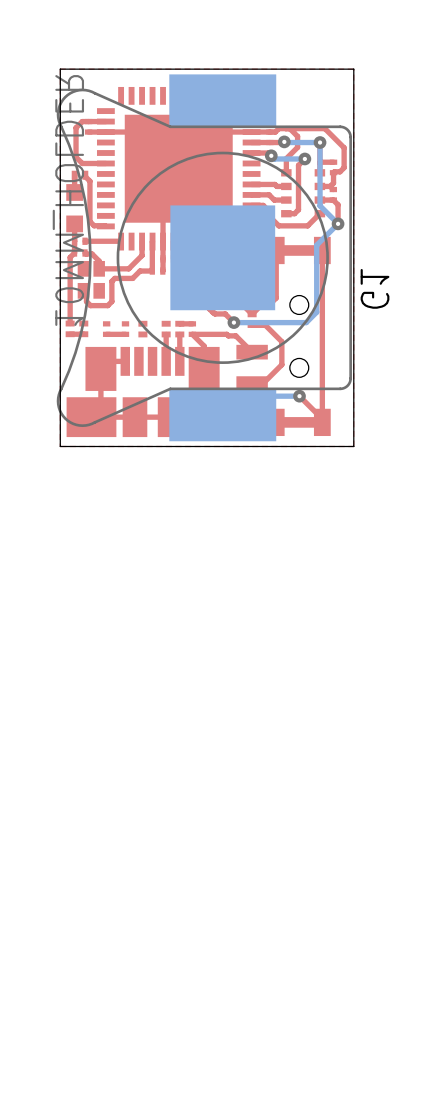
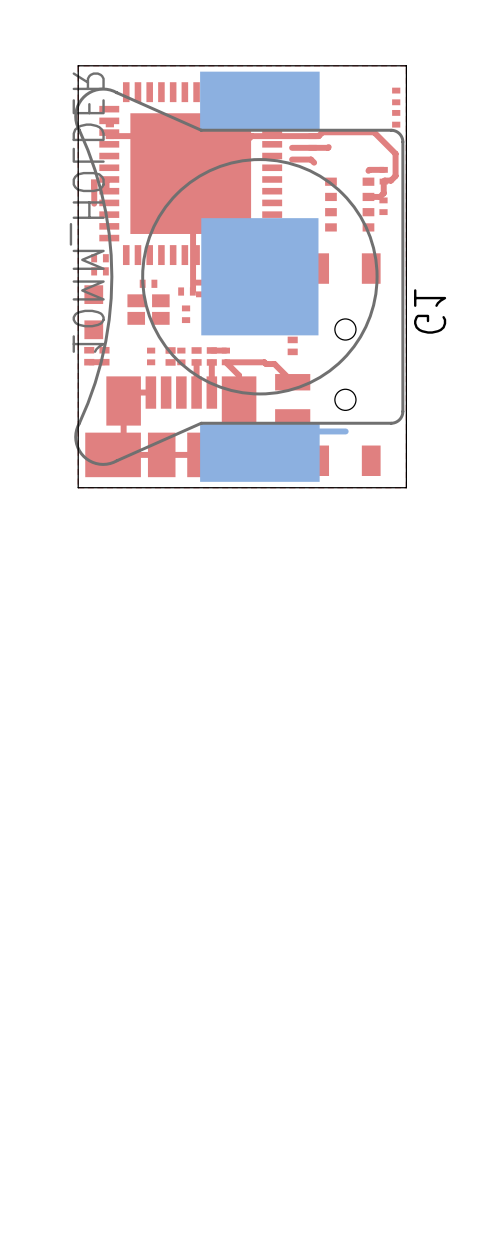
part: none -> (396, 96)
part: none -> (396, 118)
top track: (105, 121) (82, 121) (76, 127) (76, 157) (82, 163) (105, 163) -> none
top track: (289, 128) (297, 136) (297, 147) (286, 158) (286, 172) -> none
bottom track: (284, 141) (320, 142) (320, 205) (338, 223) (316, 245) (316, 312) (306, 322) (233, 322) -> none
via: (284, 141) -> none
via: (320, 142) -> none
bottom track: (271, 155) (274, 158) (304, 158) -> none
via: (271, 155) -> none
top track: (304, 158) (298, 165) (298, 209) (294, 213) (286, 213) -> none
via: (304, 158) -> none
part position: (178, 168) -> (190, 173)
top track: (85, 175) (89, 181) (89, 221) (94, 225) (105, 226) -> none
top track: (251, 184) (286, 186) -> none
top track: (251, 194) (269, 194) (274, 200) (286, 200) -> none
top track: (319, 200) (333, 200) (338, 204) (338, 223) -> none
top track: (251, 205) (263, 205) (267, 209) (267, 214) (278, 225) (307, 225) (319, 213) -> none
part position: (74, 208) -> (93, 312)
top track: (74, 223) (74, 253) (70, 257) (70, 323) -> none
via: (338, 223) -> none
top track: (85, 241) (121, 241) -> none
top track: (142, 241) (142, 255) (128, 268) (99, 268) (99, 261) (92, 254) (85, 253) -> none
top track: (152, 241) (152, 271) (140, 271) (132, 278) (114, 278) (111, 281) (111, 301) (107, 305) (90, 305) (86, 301) (86, 293) (83, 290) -> none
part: none -> (148, 283)
part: none -> (200, 288)
part rotation: 0° (91, 279) -> 90° clockwise (148, 309)
part position: (91, 279) -> (148, 309)
part: none -> (186, 314)
top track: (208, 299) (209, 308) (213, 312) (225, 313) (233, 322) -> none
top track: (218, 304) (241, 303) (252, 314) (262, 303) (270, 303) (276, 298) (276, 250) (322, 250) (322, 422) (276, 422) -> none
via: (233, 322) -> none
top track: (252, 325) (265, 325) (281, 341) (281, 364) (263, 383) (252, 383) -> none
part: (106, 329) -> none
part: none -> (181, 356)
top track: (125, 334) (106, 334) -> none
top track: (299, 396) (322, 419) -> none
via: (299, 396) -> none

